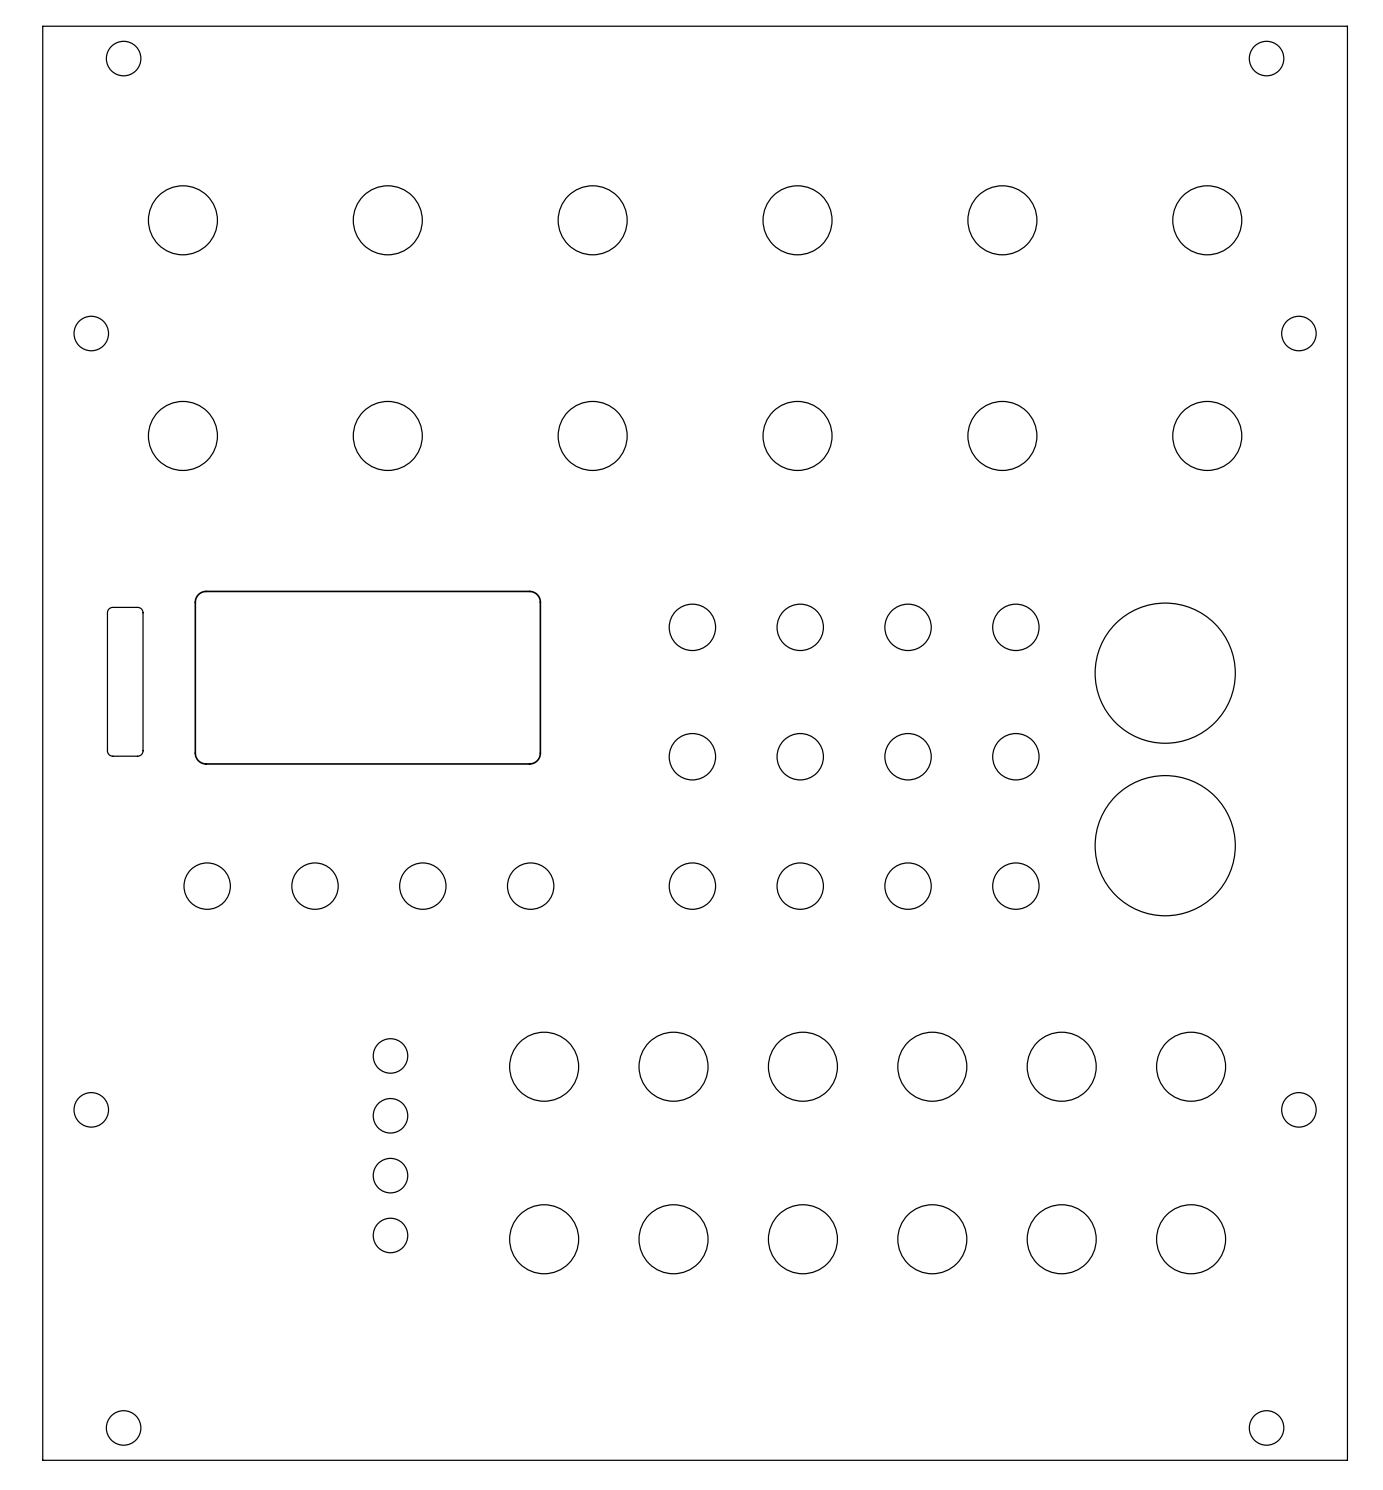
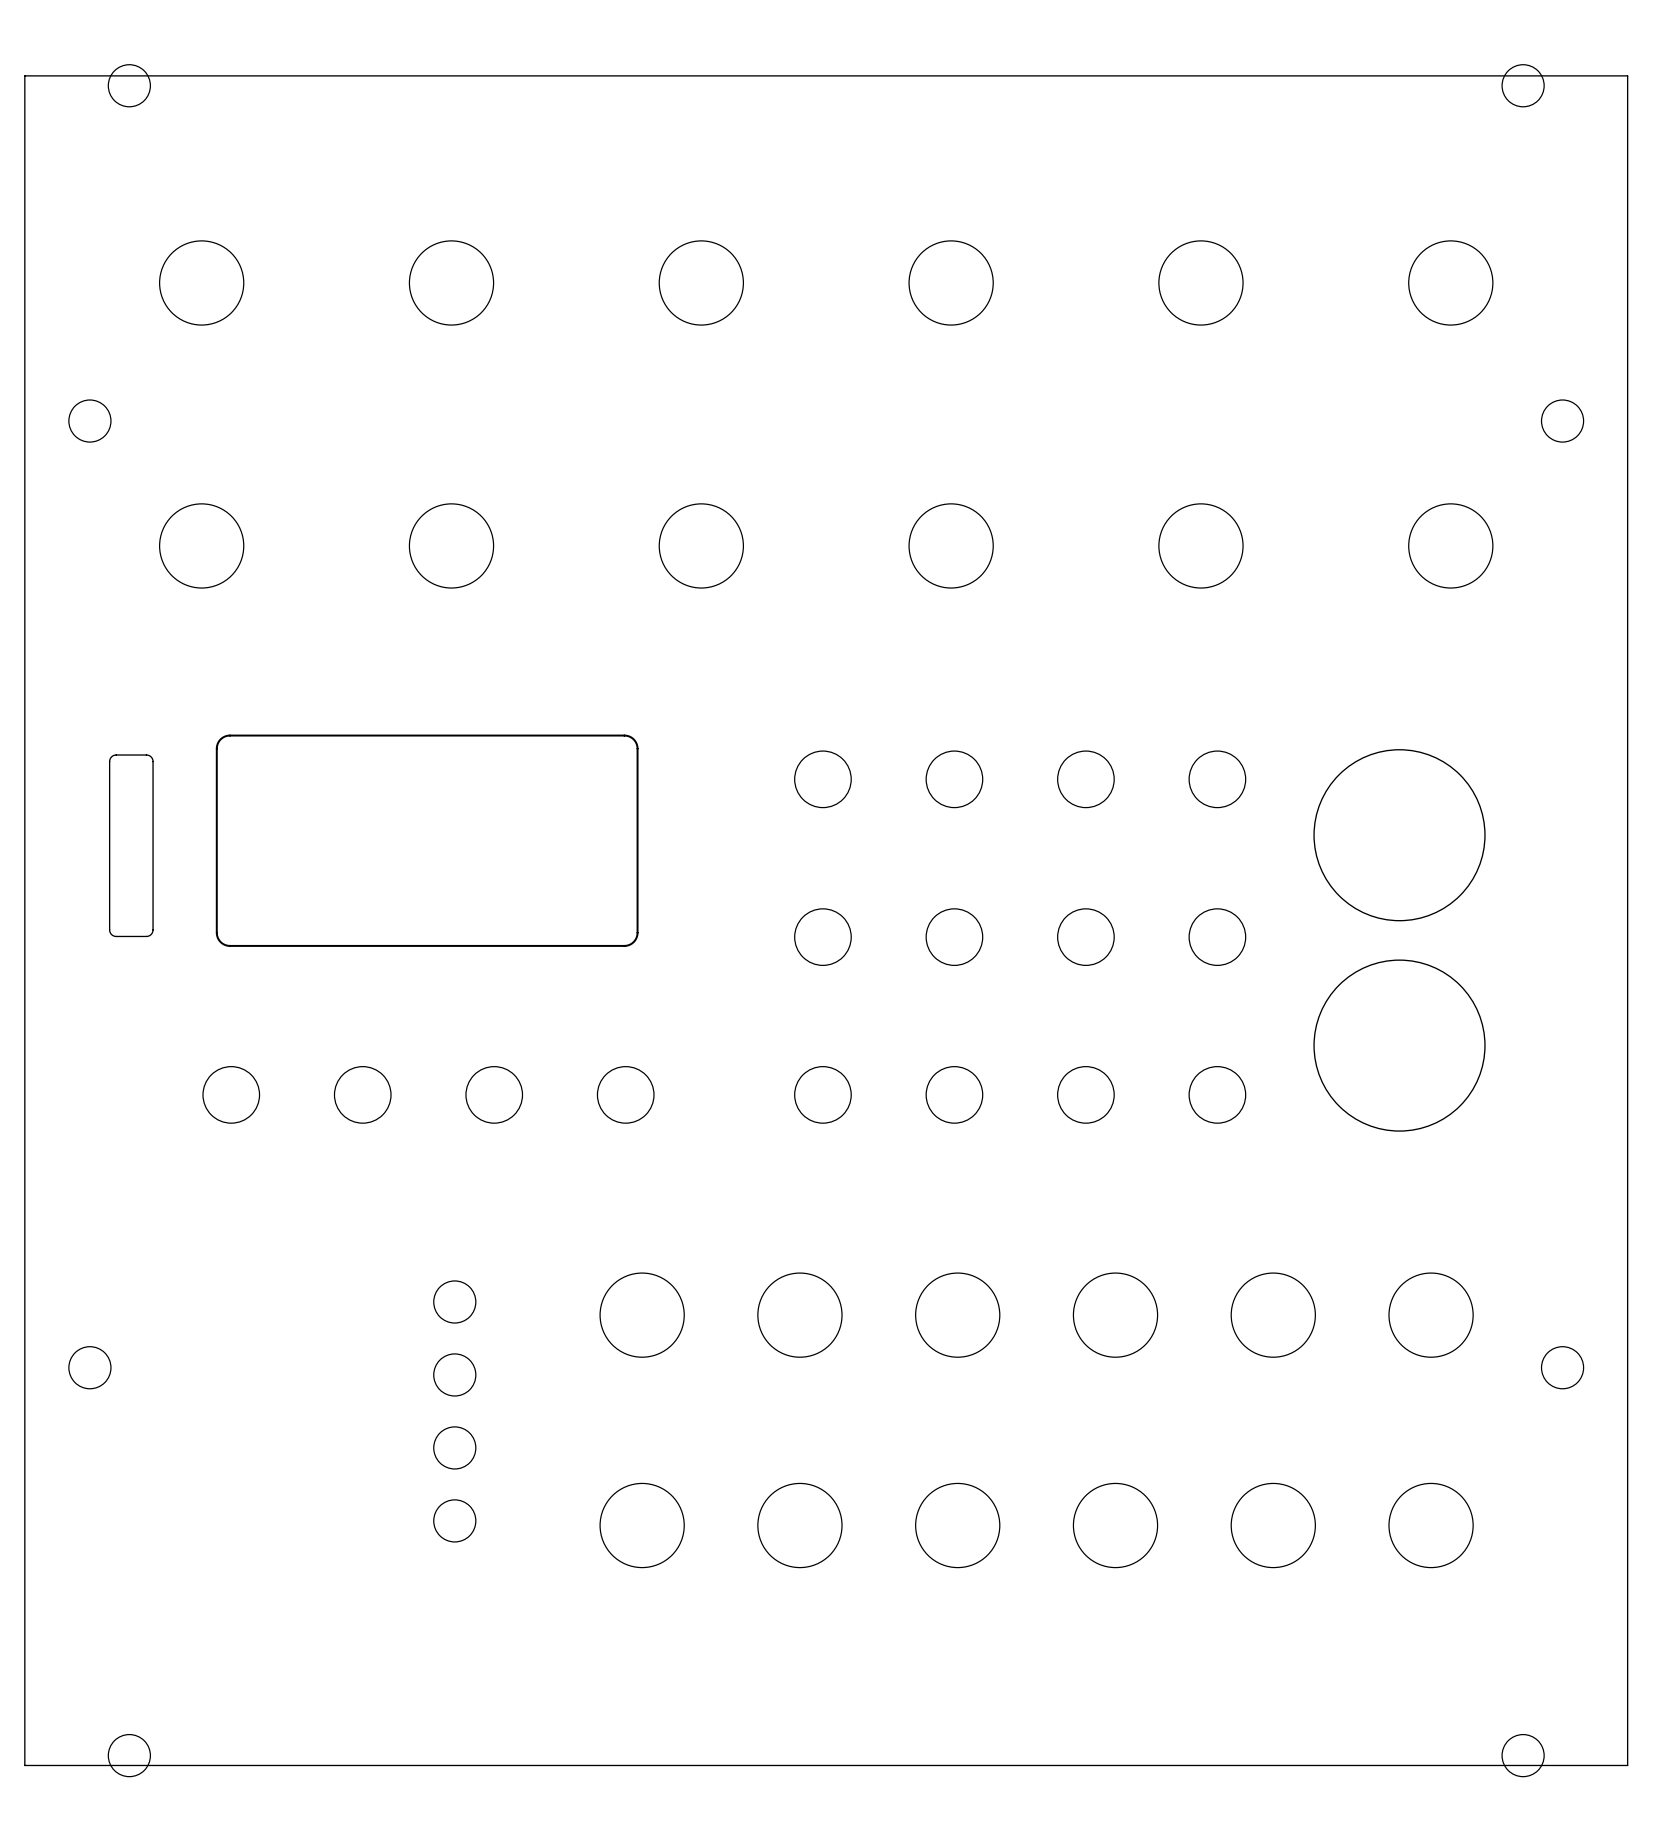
board edge: (1347, 26) (42, 26) (42, 1460) (1347, 1460) (1347, 26) -> (1627, 75) (1627, 1765) (24, 1765) (24, 75) (1627, 75)

